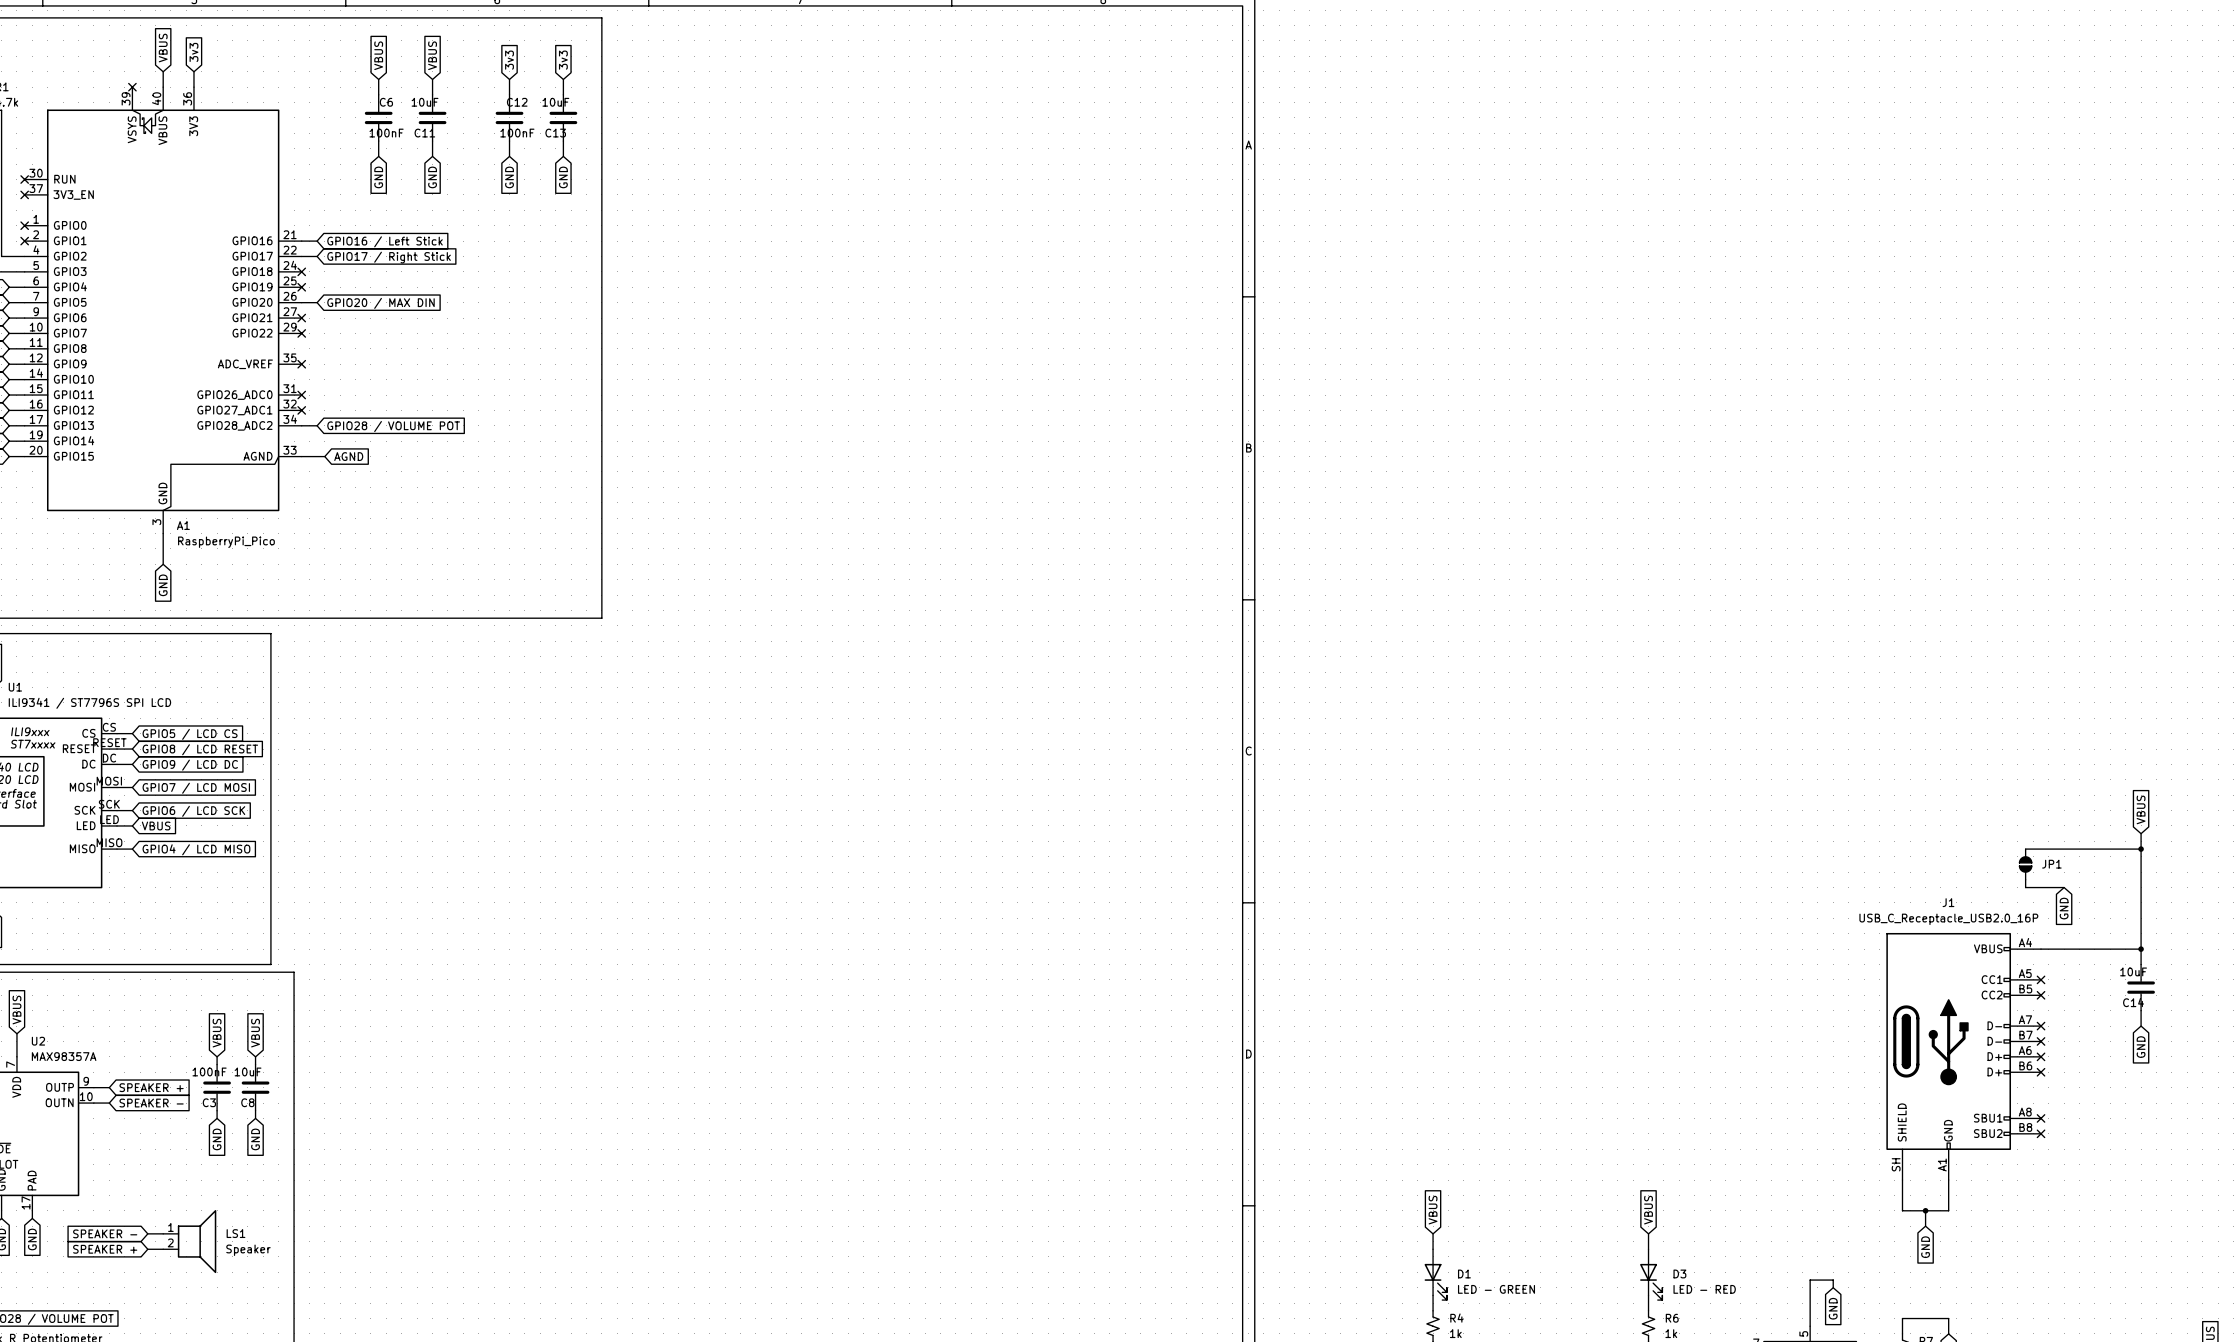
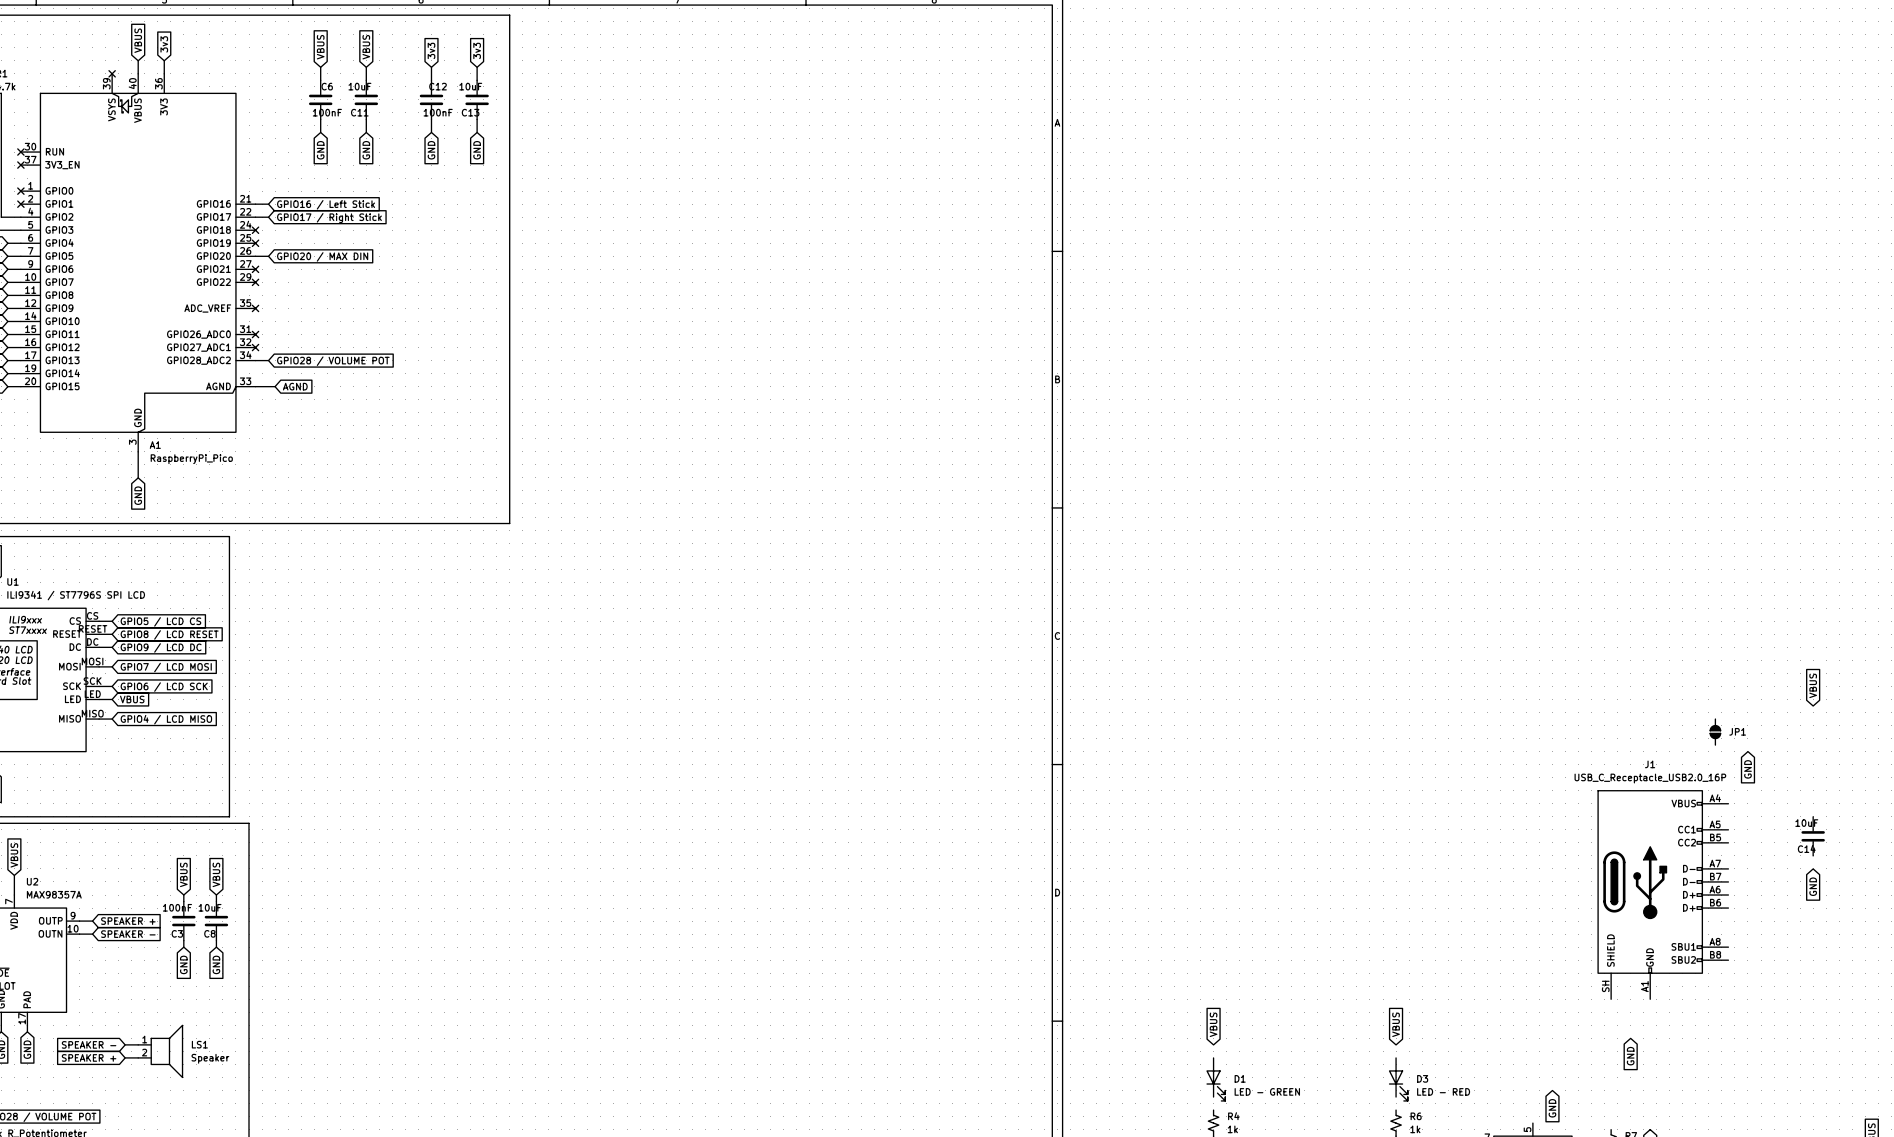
wire: (2141, 833) (2141, 964) -> none
wire: (2025, 849) (2141, 849) -> none
junction: (2141, 849) -> none
wire: (2025, 879) (2025, 887) (2064, 887) -> none
wire: (2041, 949) (2141, 949) -> none
junction: (2141, 949) -> none
no-connect mark: (2041, 979) -> none
no-connect mark: (2041, 995) -> none
wire: (2141, 1010) (2141, 1026) -> none
no-connect mark: (2041, 1026) -> none
no-connect mark: (2041, 1041) -> none
no-connect mark: (2041, 1056) -> none
no-connect mark: (2041, 1072) -> none
no-connect mark: (2041, 1118) -> none
no-connect mark: (2041, 1133) -> none
wire: (1902, 1180) (1902, 1210) (1948, 1210) (1948, 1180) -> none
wire: (1925, 1210) (1925, 1226) -> none
junction: (1925, 1210) -> none
wire: (1433, 1233) (1433, 1249) -> none
wire: (1648, 1233) (1648, 1249) -> none
wire: (1833, 1287) (1833, 1280) (1810, 1280) (1810, 1326) -> none
wire: (1433, 1295) (1433, 1310) -> none
wire: (1648, 1295) (1648, 1310) -> none
wire: (1902, 1333) (1902, 1318) (1948, 1318) (1948, 1333) -> none

